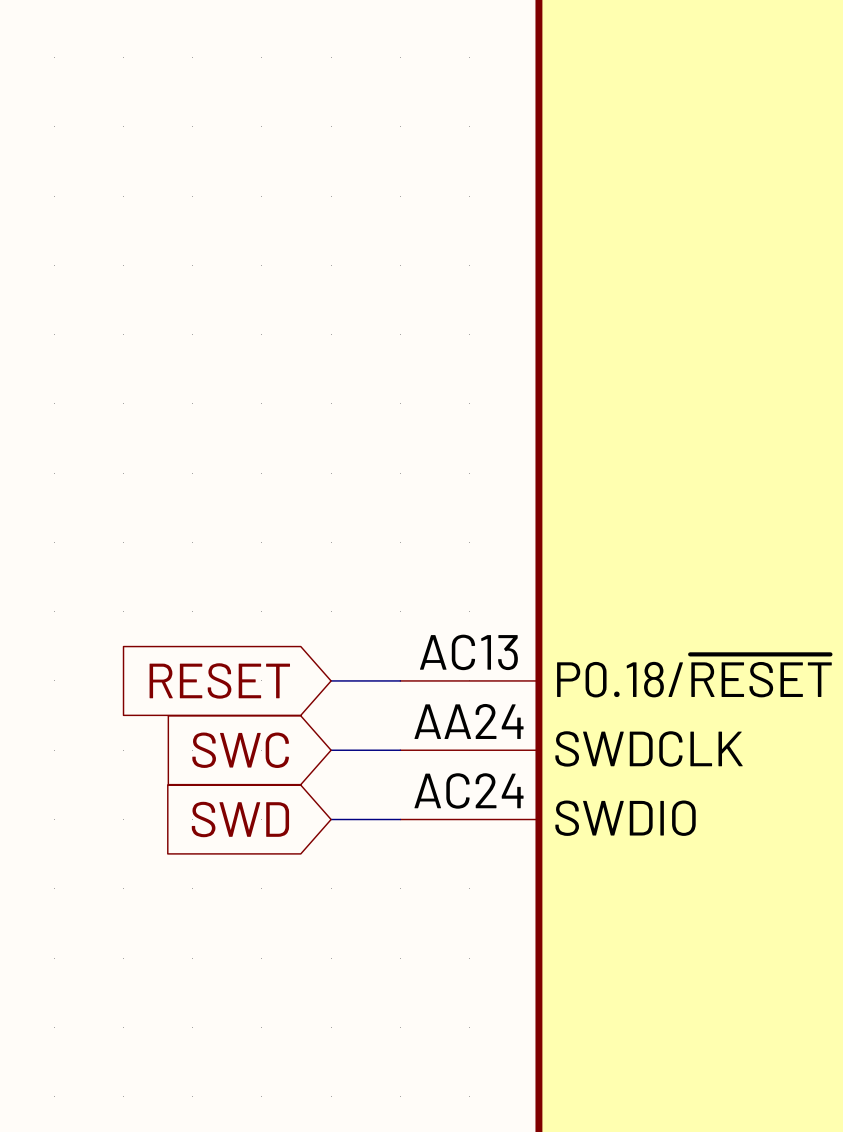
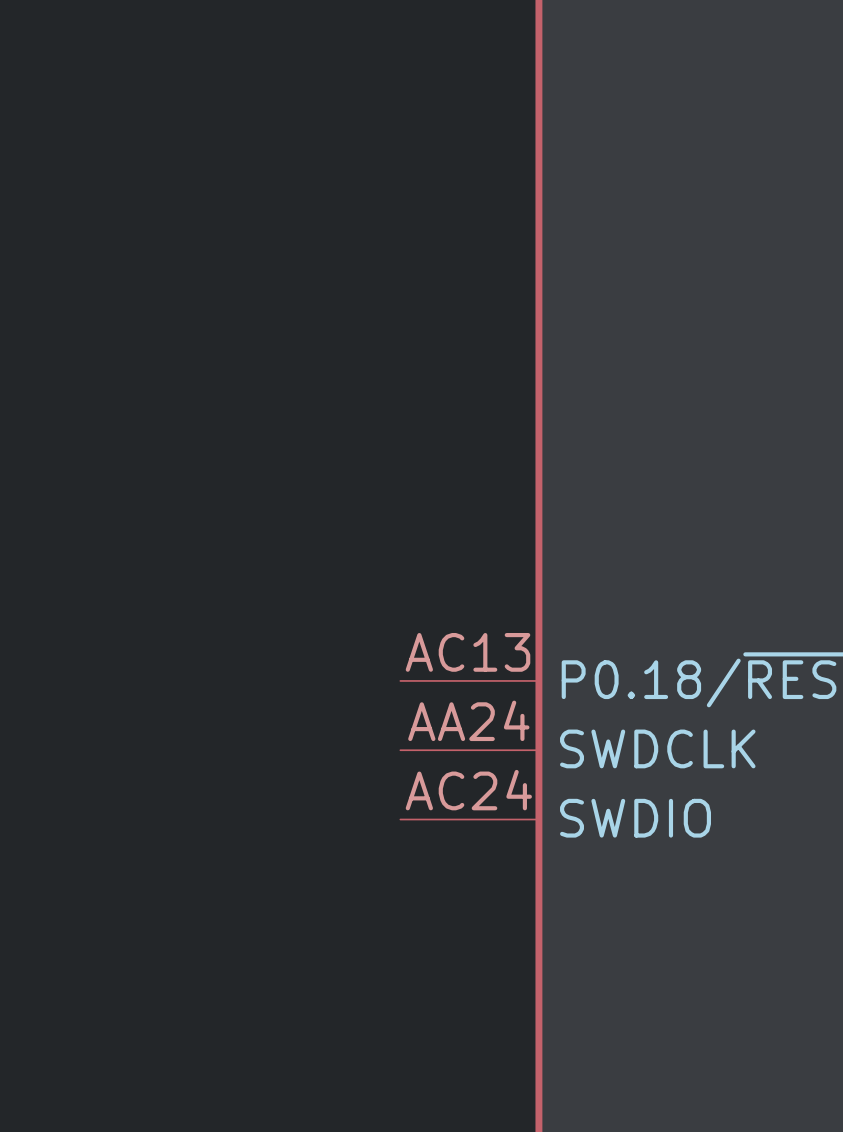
global label: RESET (219, 680) -> none
wire: (331, 680) (400, 680) -> none
global label: SWC (240, 750) -> none
wire: (331, 750) (400, 750) -> none
global label: SWD (240, 819) -> none
wire: (331, 819) (400, 819) -> none

